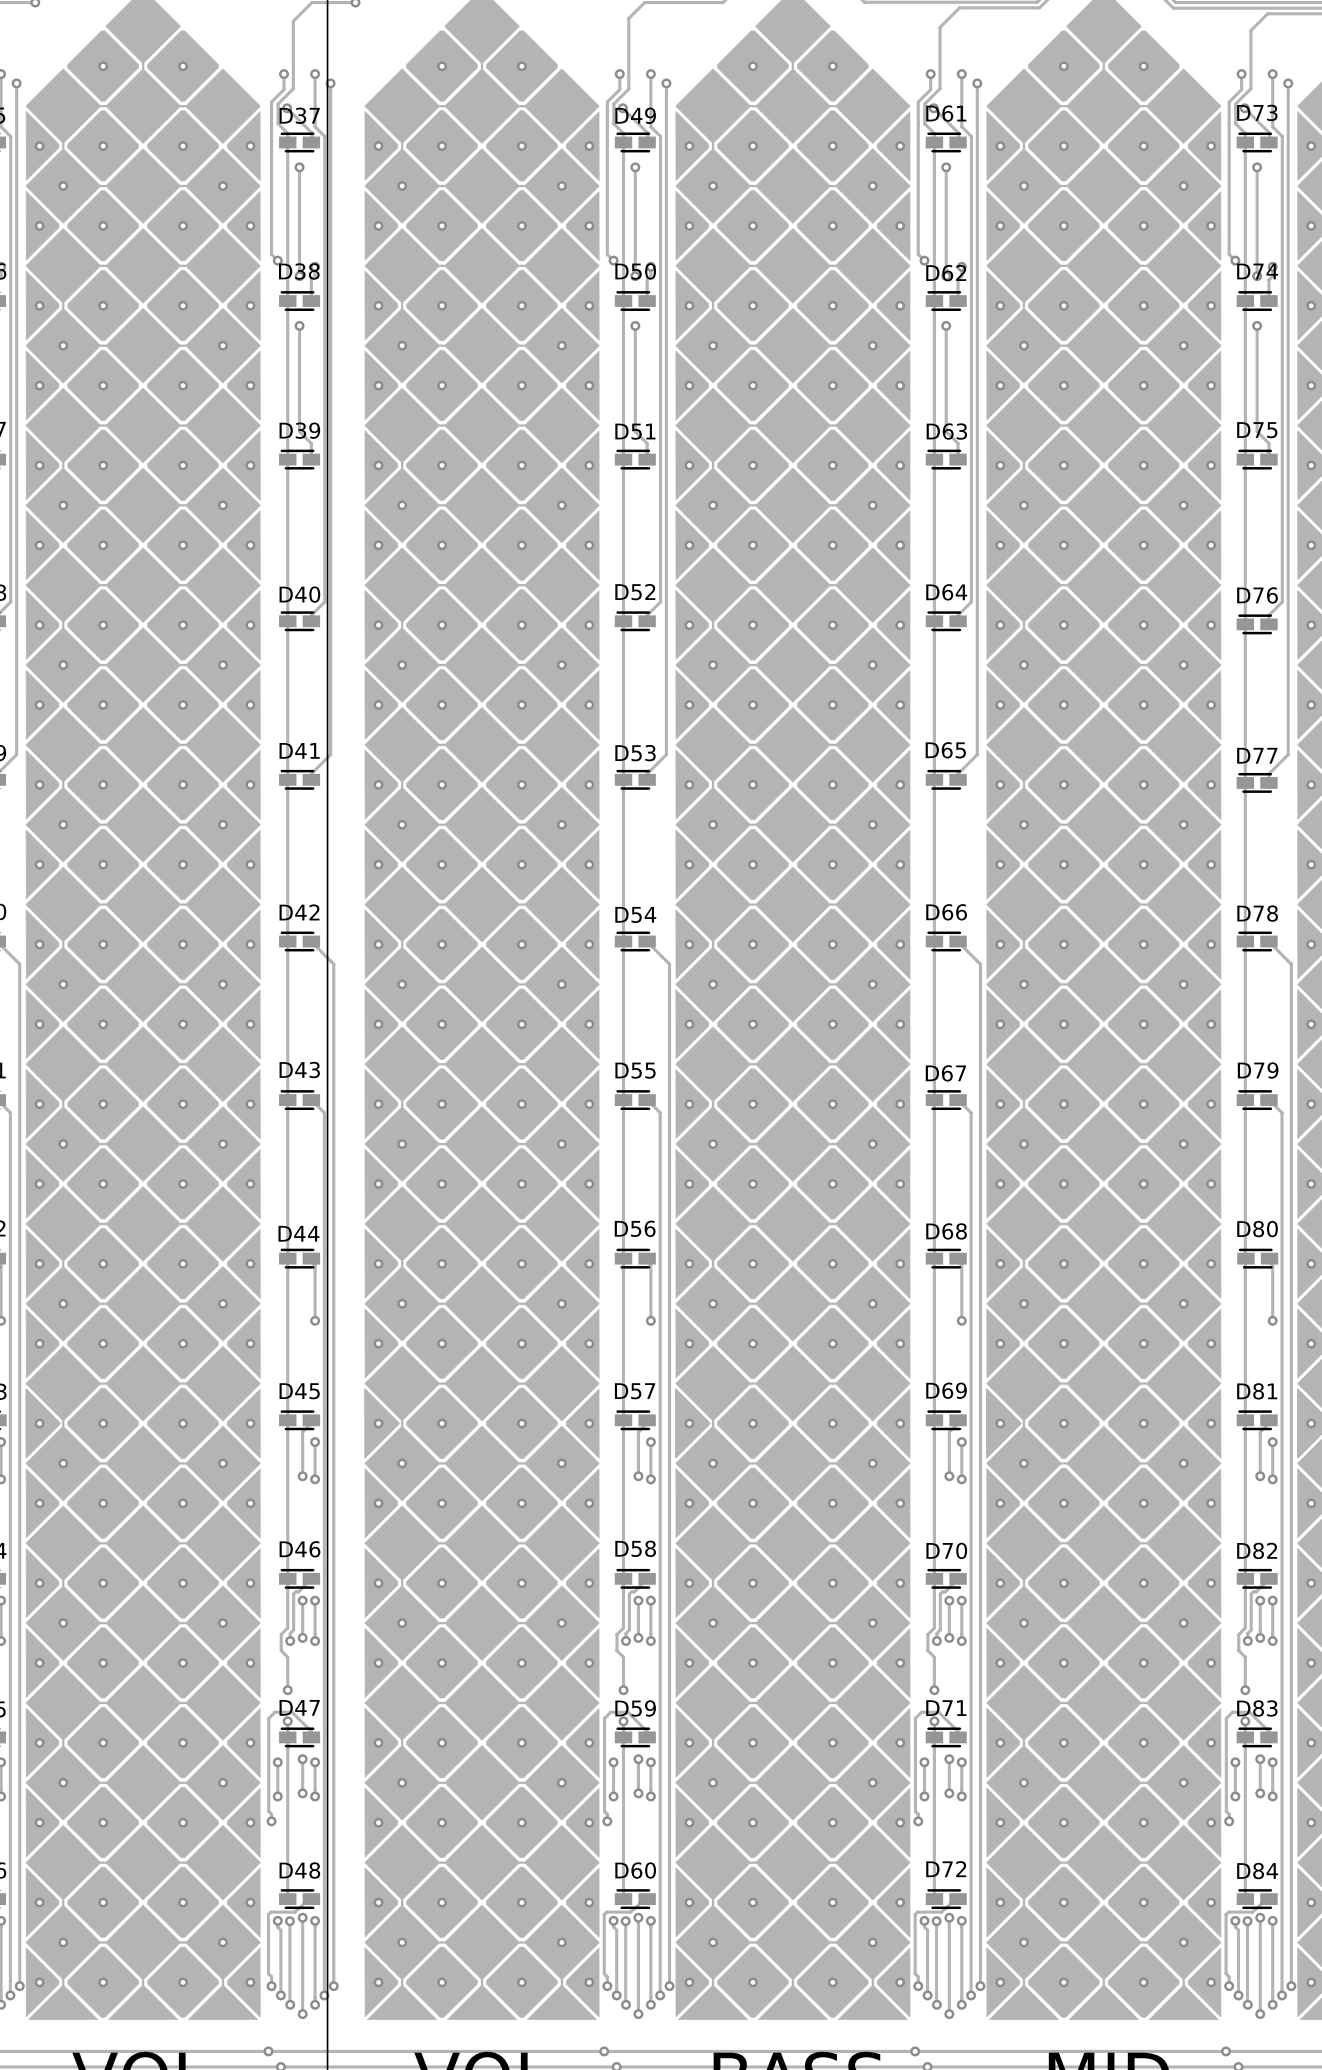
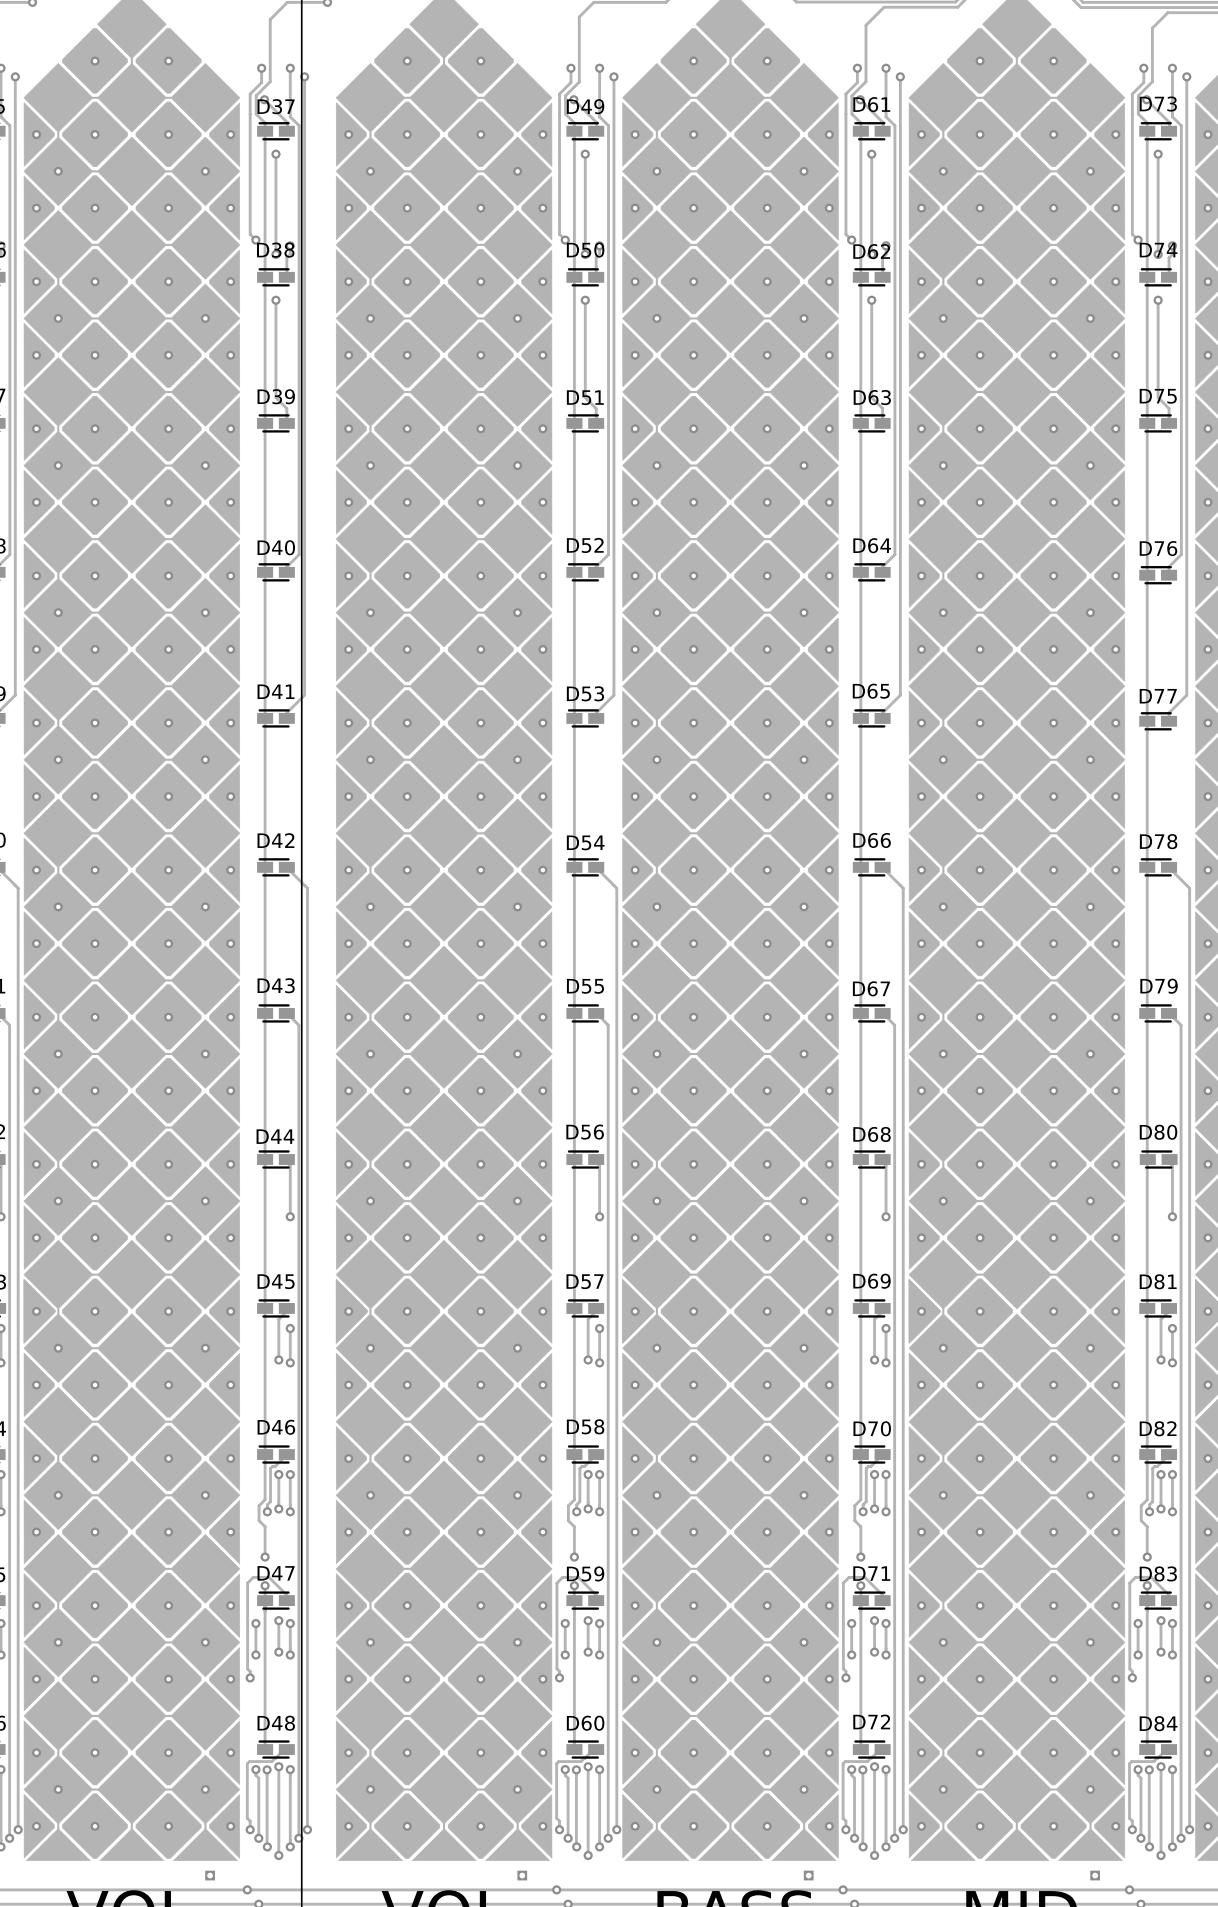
part: none -> (210, 1875)
part: none -> (522, 1875)
part: none -> (808, 1875)
part: none -> (1095, 1875)

